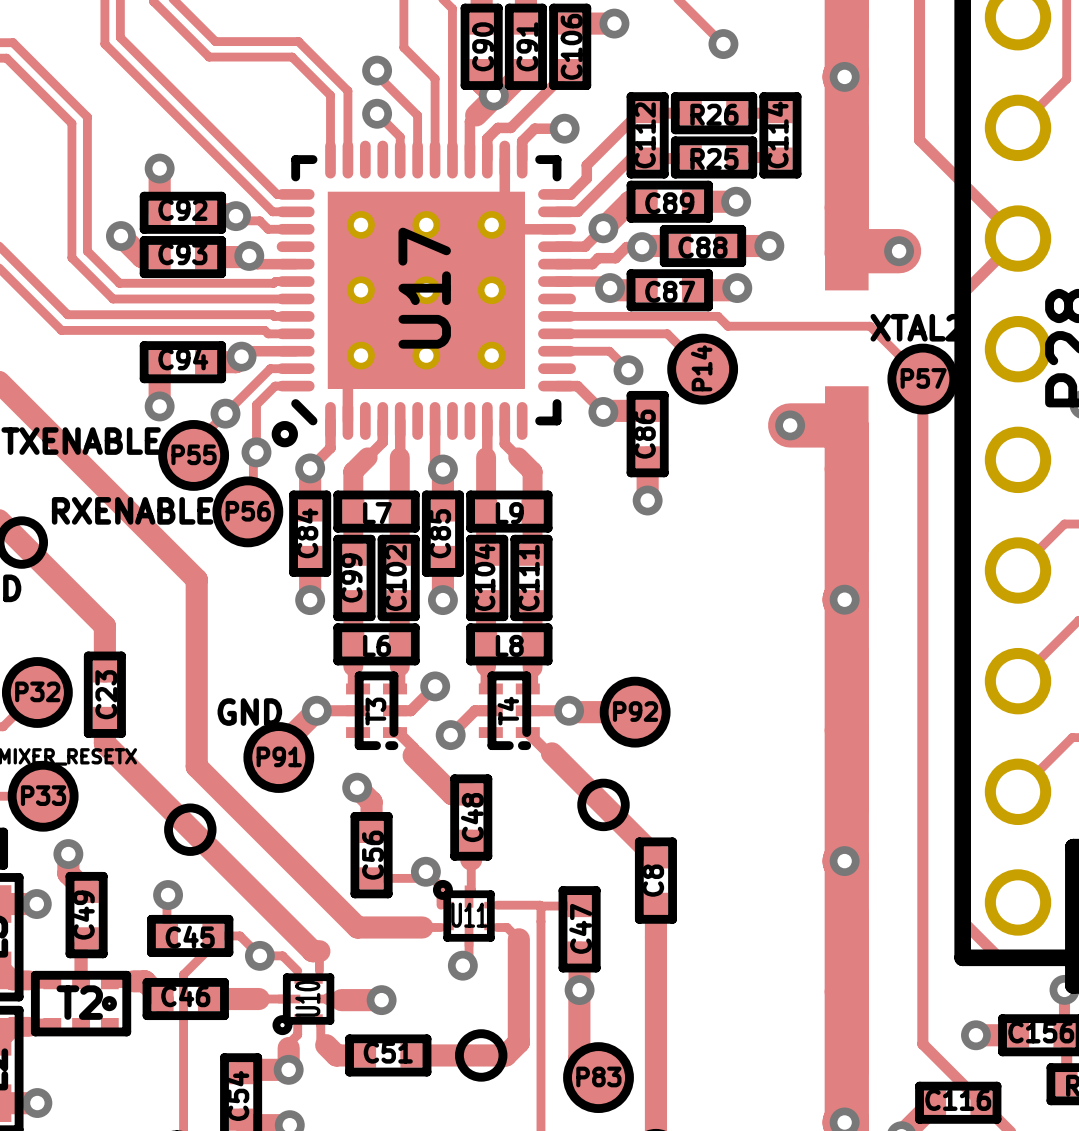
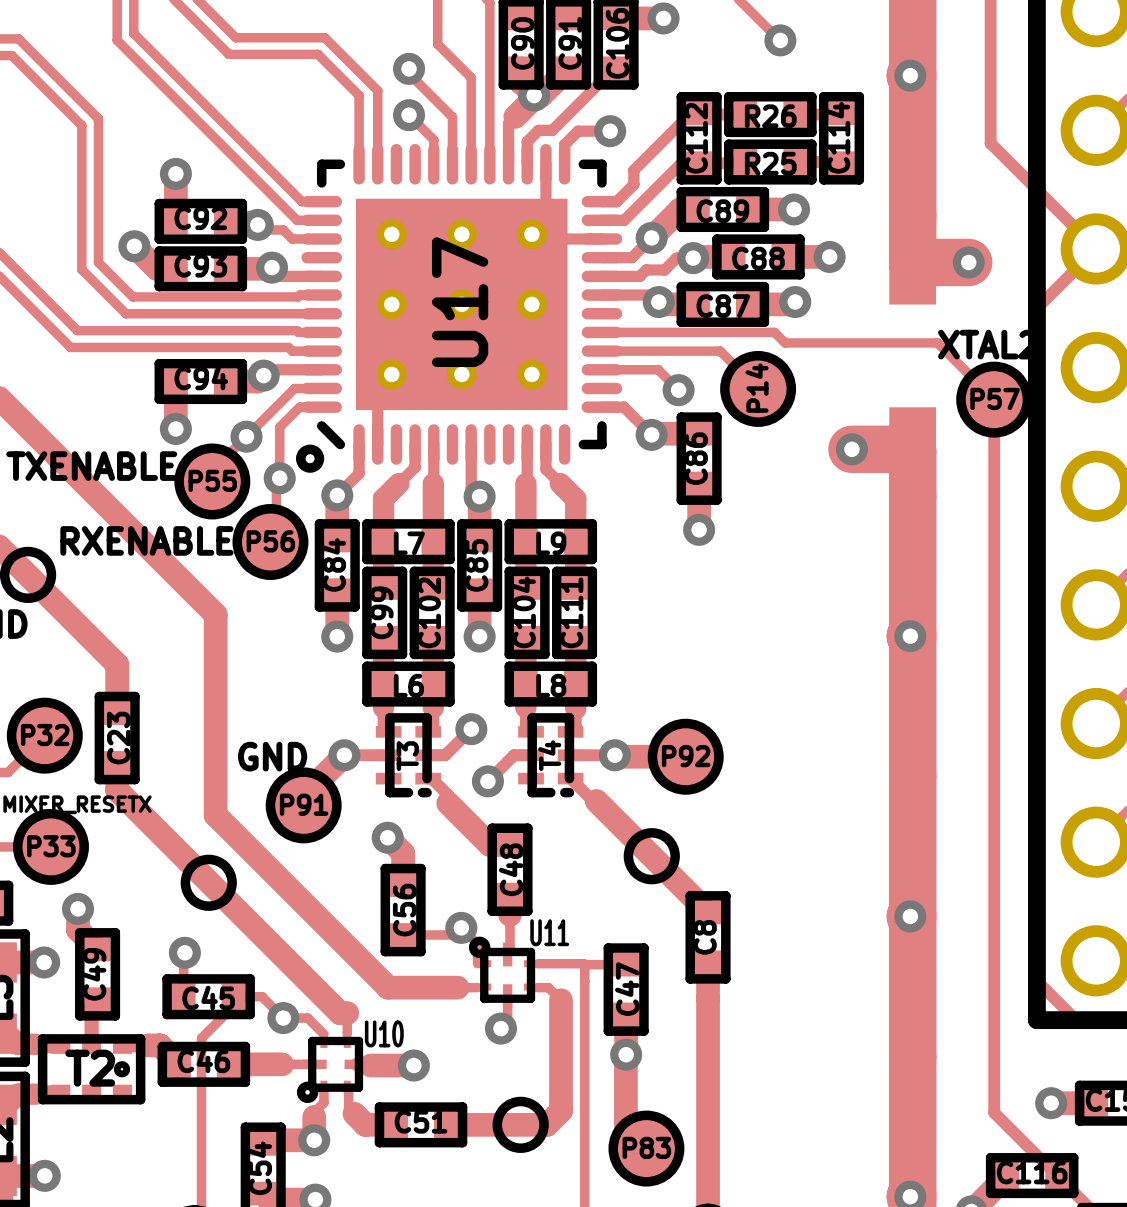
U11 name position: U11 (469, 915) -> U11 (549, 932)
U10 name rotation: 0° (307, 998) -> 90° clockwise (384, 1033)
U10 name position: U10 (307, 998) -> U10 (384, 1033)

